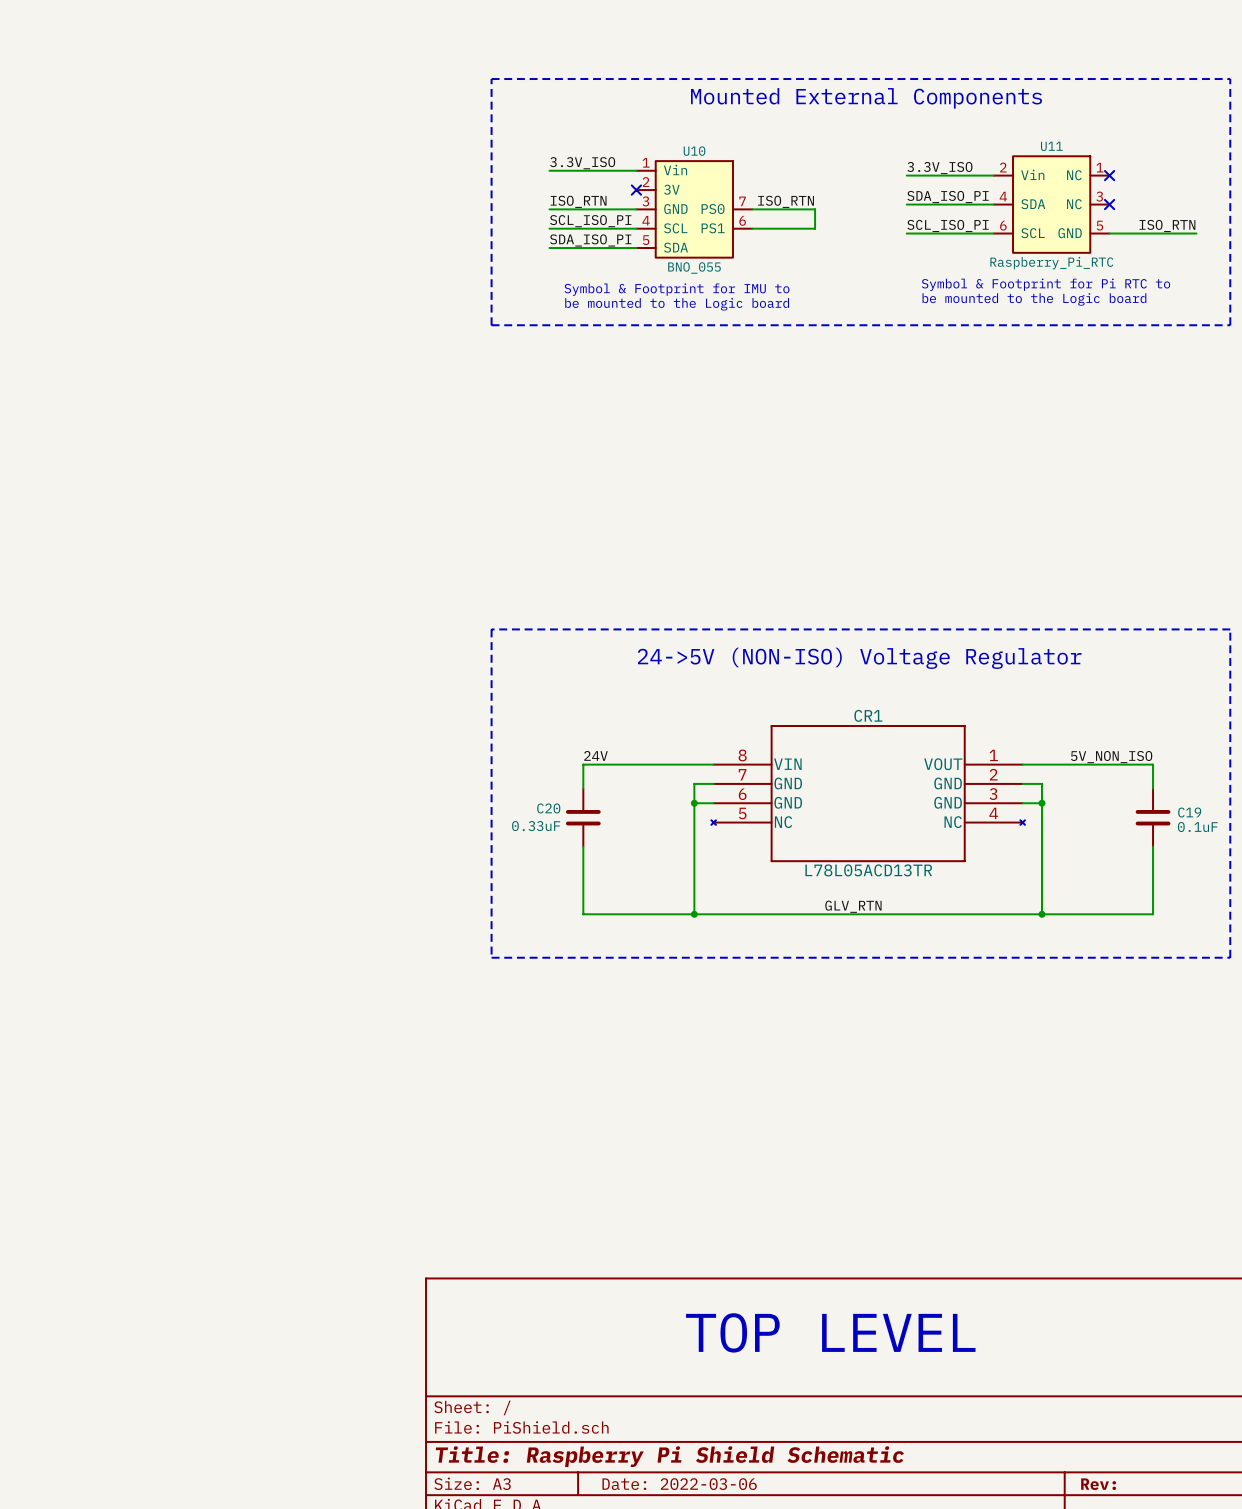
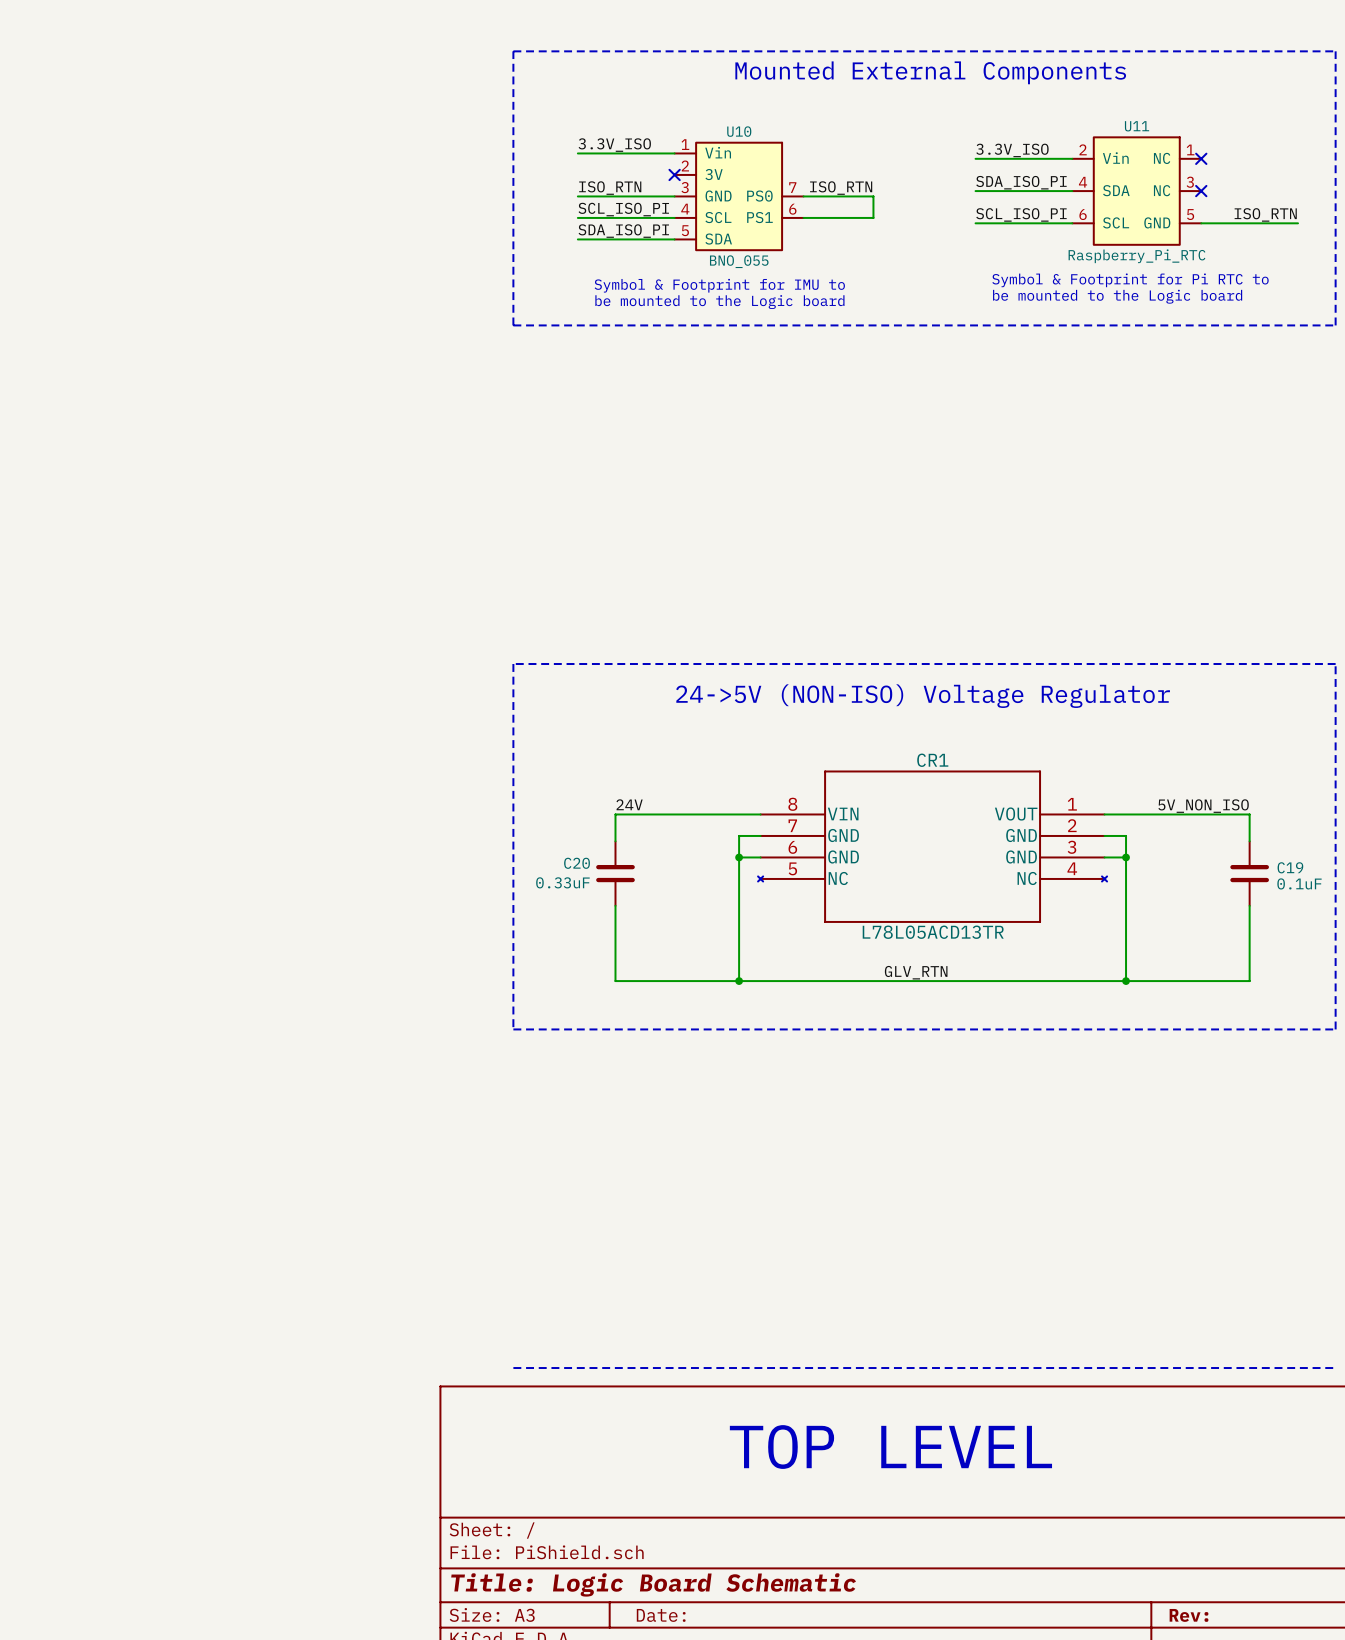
line: none -> (513, 1368) (1335, 1368)
title block: Title: Raspberry Pi Shield Schematic (669, 1456) -> Title: Logic Board Schematic (653, 1584)
title block: Date: 2022-03-06 (679, 1484) -> Date: (661, 1615)

